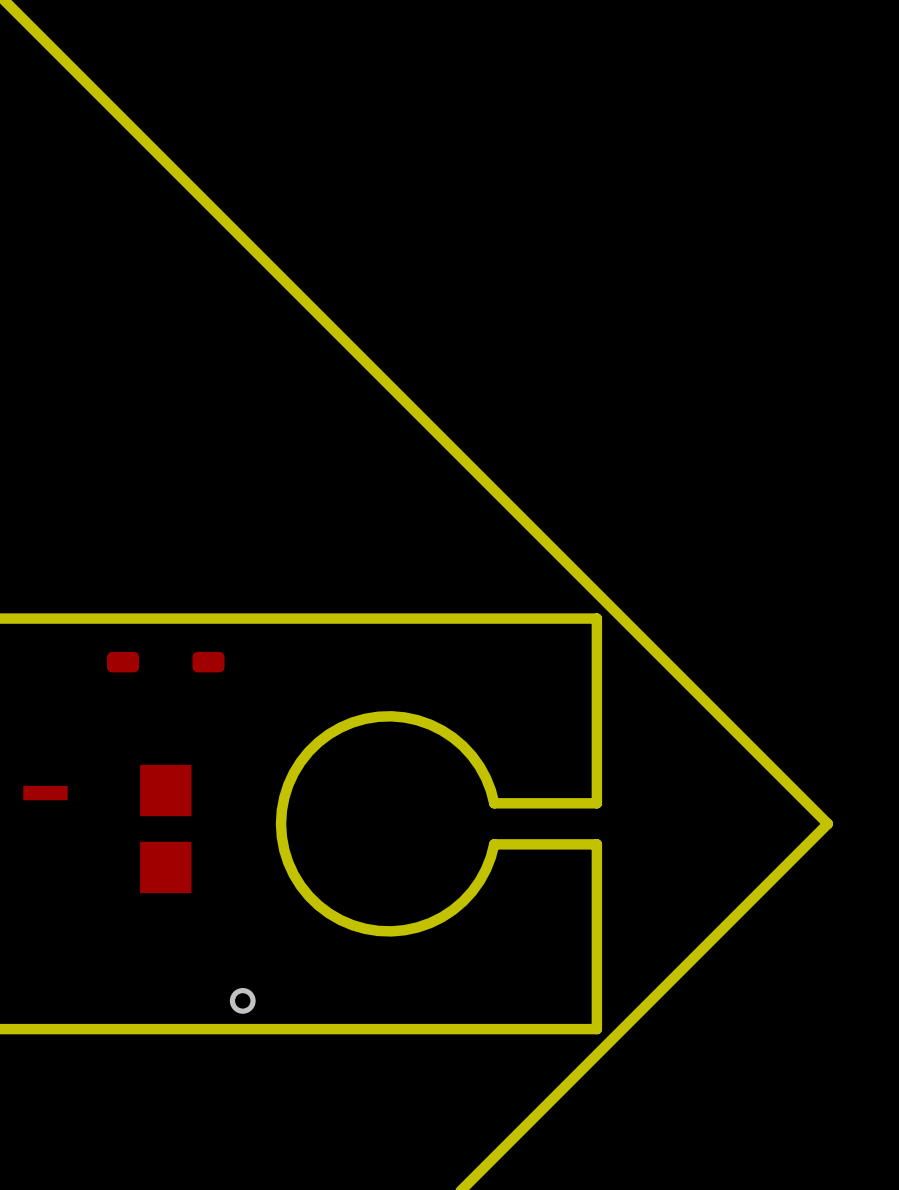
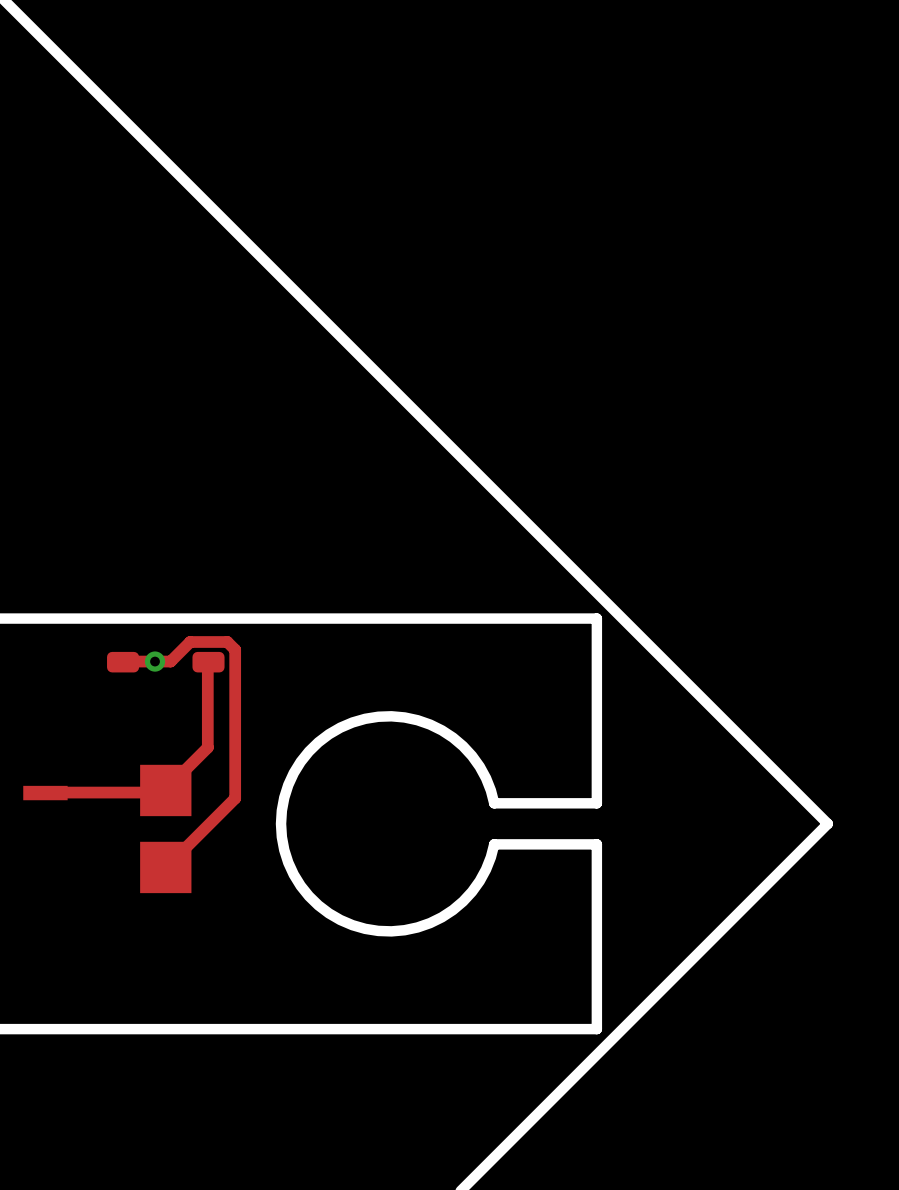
via: none -> (155, 661)
top track: none -> (123, 662) (170, 661) (190, 641) (227, 641) (235, 649) (235, 798) (165, 867)
top track: none -> (208, 662) (207, 747) (165, 790) (160, 792) (45, 792)
via: (242, 1000) -> none

